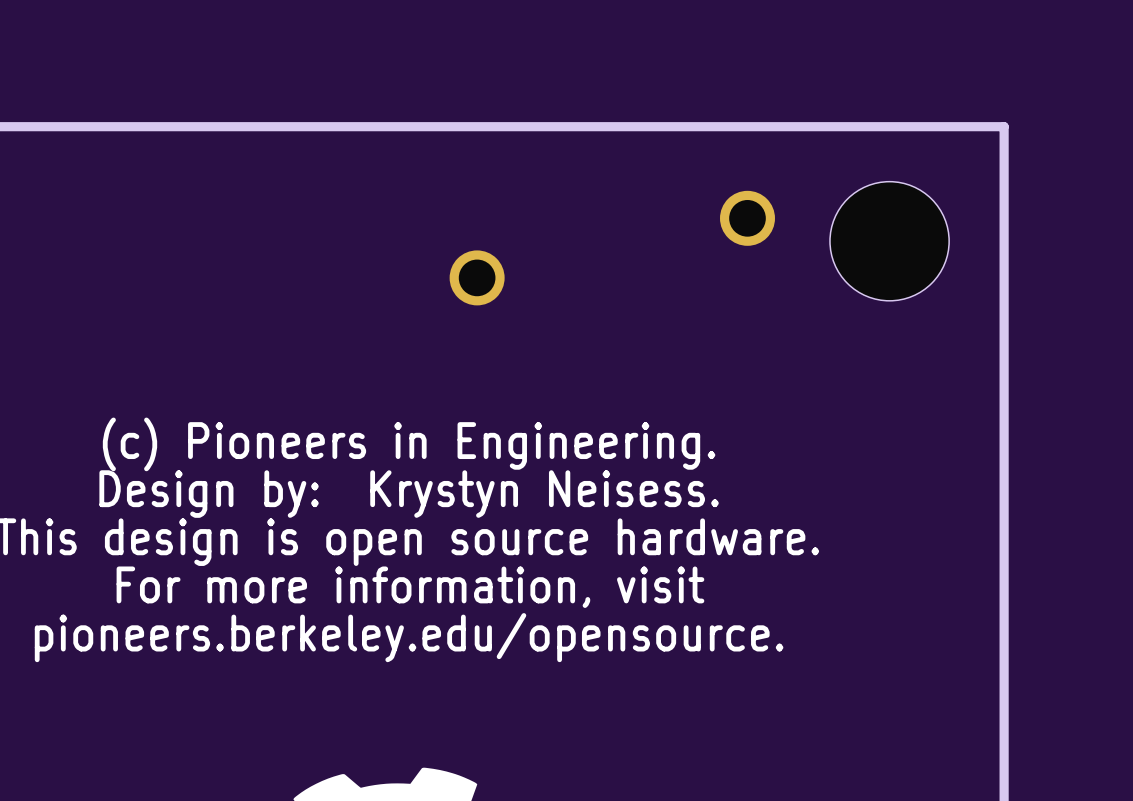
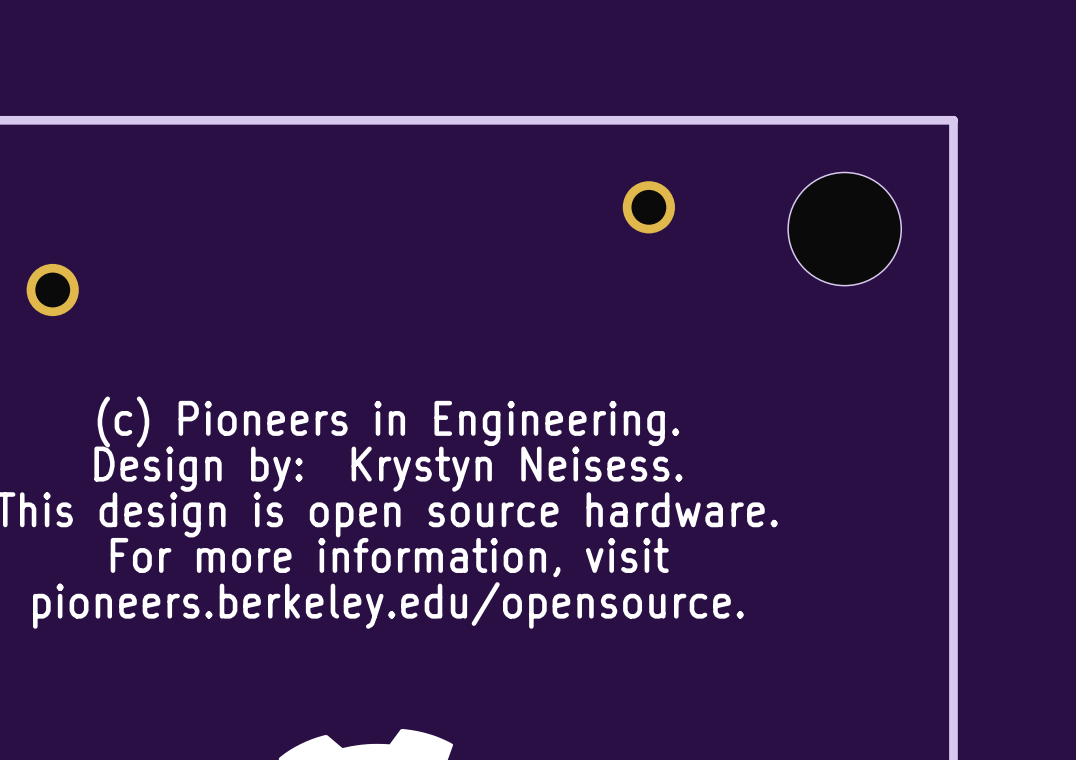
part position: (747, 218) -> (648, 207)
part: (477, 277) -> none
part: none -> (52, 289)

